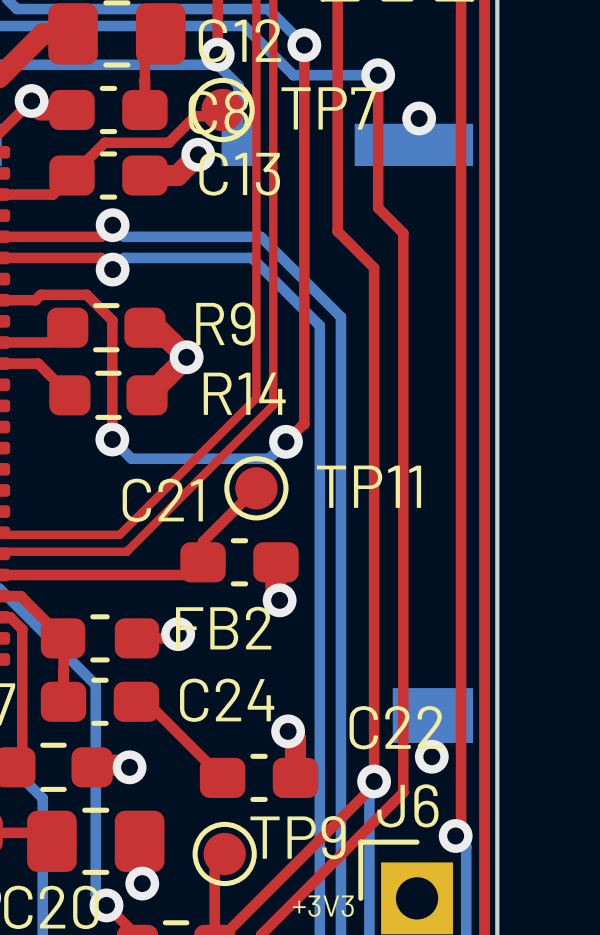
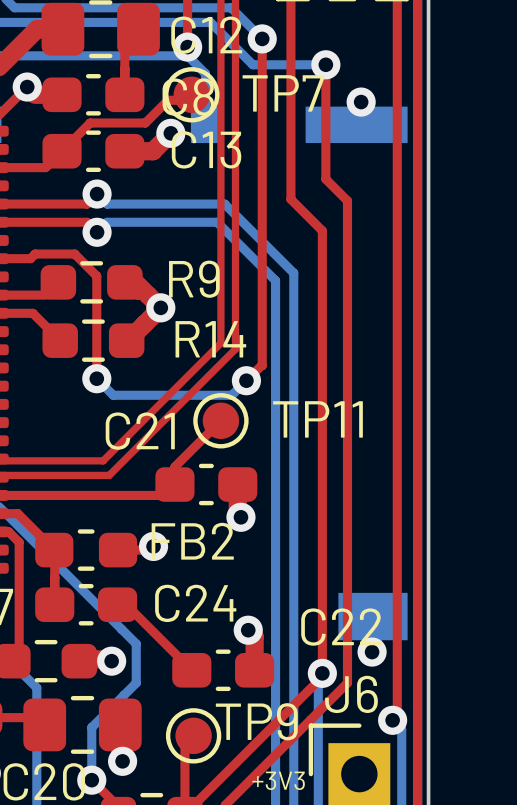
bottom track: (95, 684) (95, 894) (106, 905) -> (82, 590) (136, 643) (136, 683) (91, 727) (91, 780)

